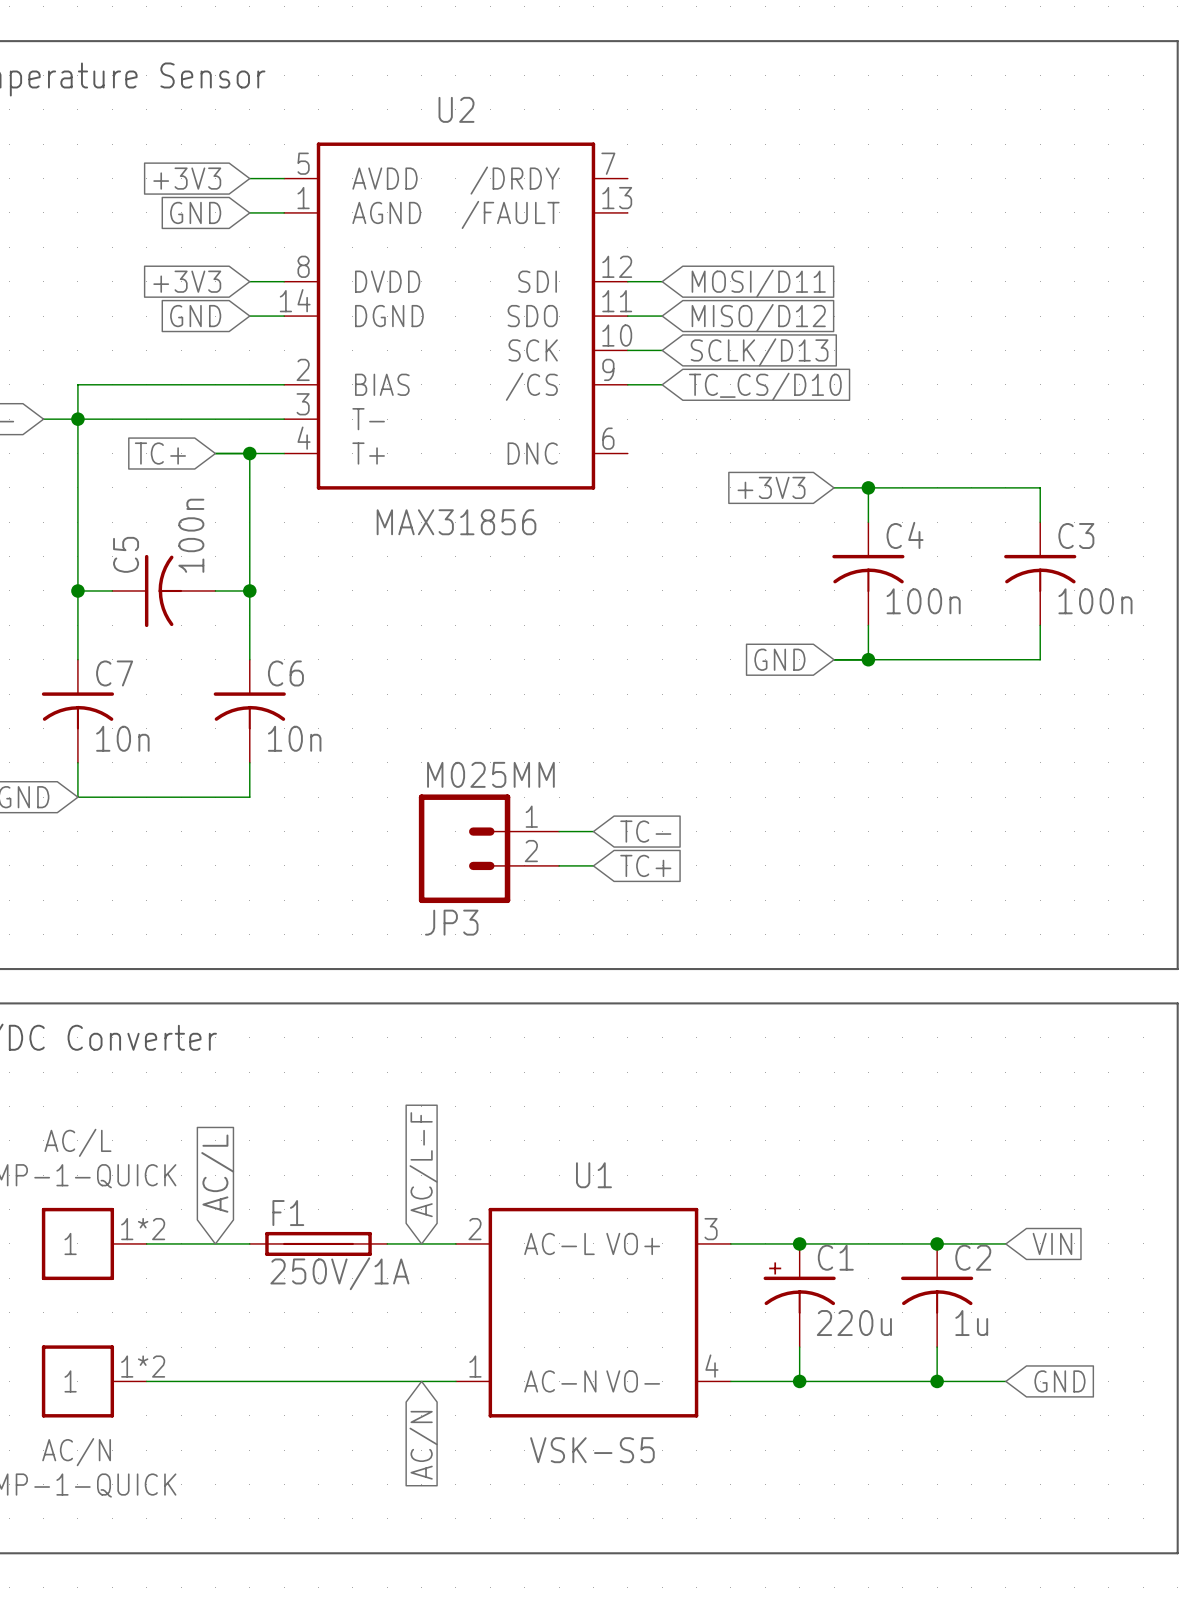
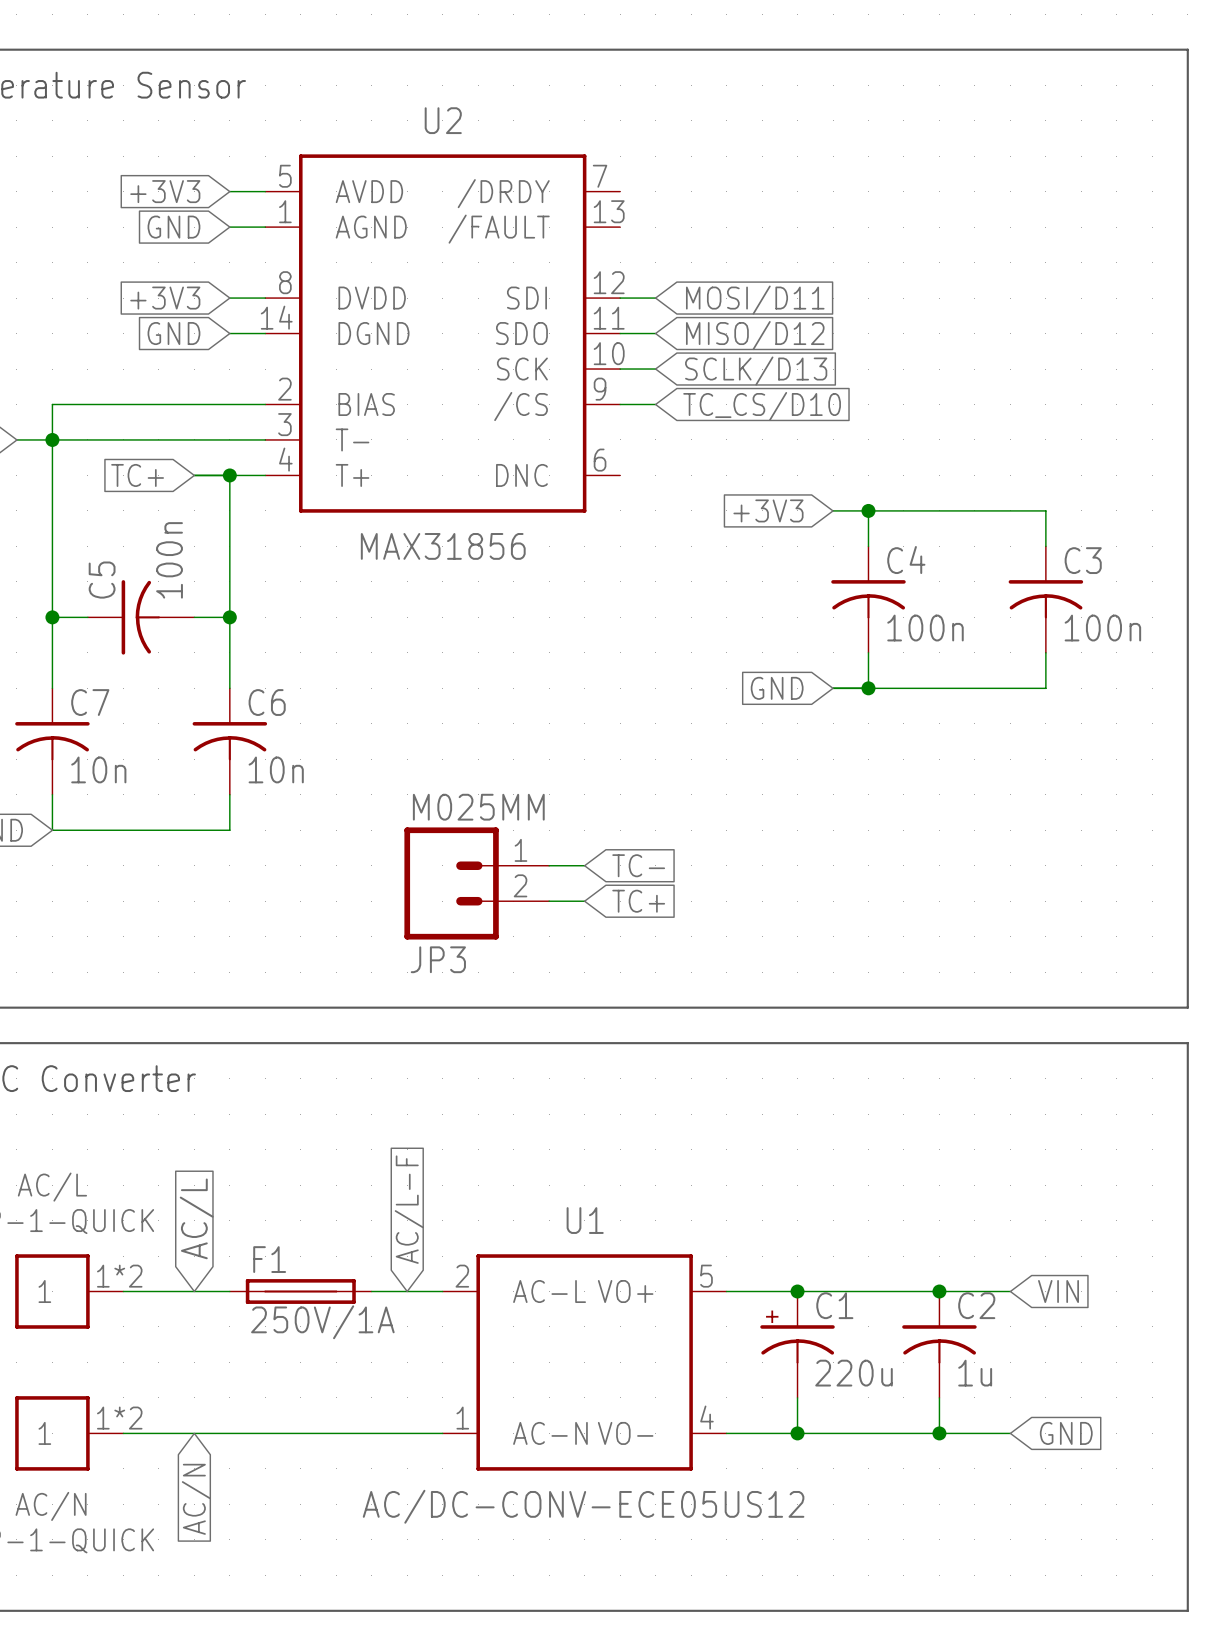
U1 pin number: 3 (711, 1229) -> 5 (706, 1276)
global label position: AC/N (423, 1445) -> AC/N (196, 1499)
U1 value: VSK-S5 (592, 1450) -> AC/DC-CONV-ECE05US12 (583, 1506)

